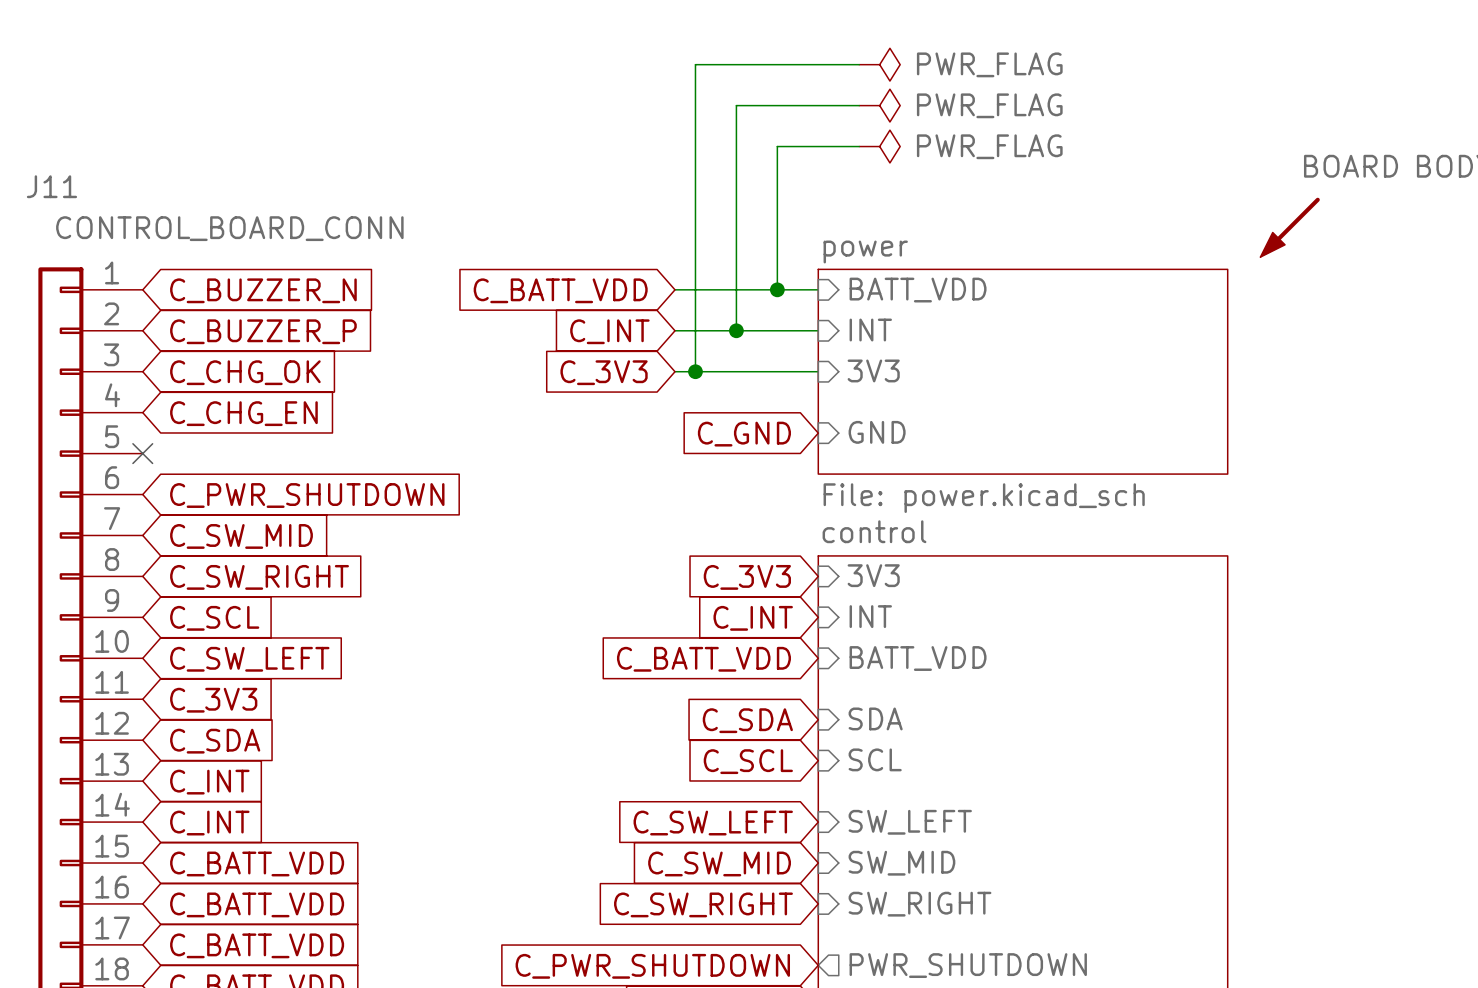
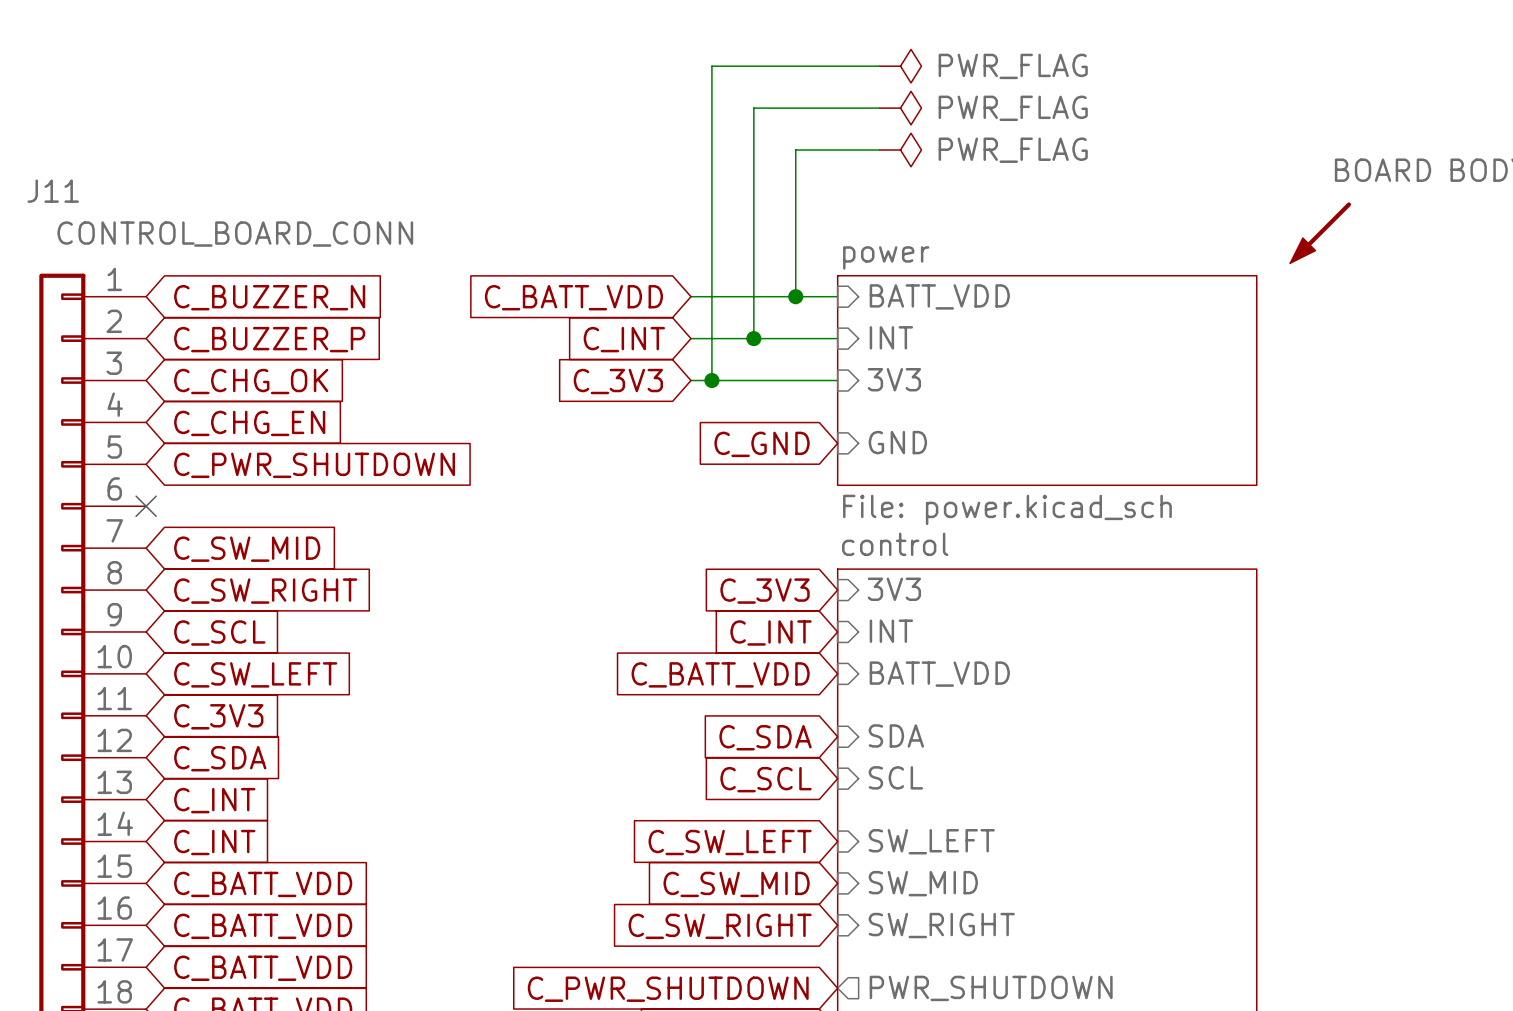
no-connect mark position: (142, 453) -> (146, 506)
global label position: C_PWR_SHUTDOWN (307, 495) -> C_PWR_SHUTDOWN (314, 465)

